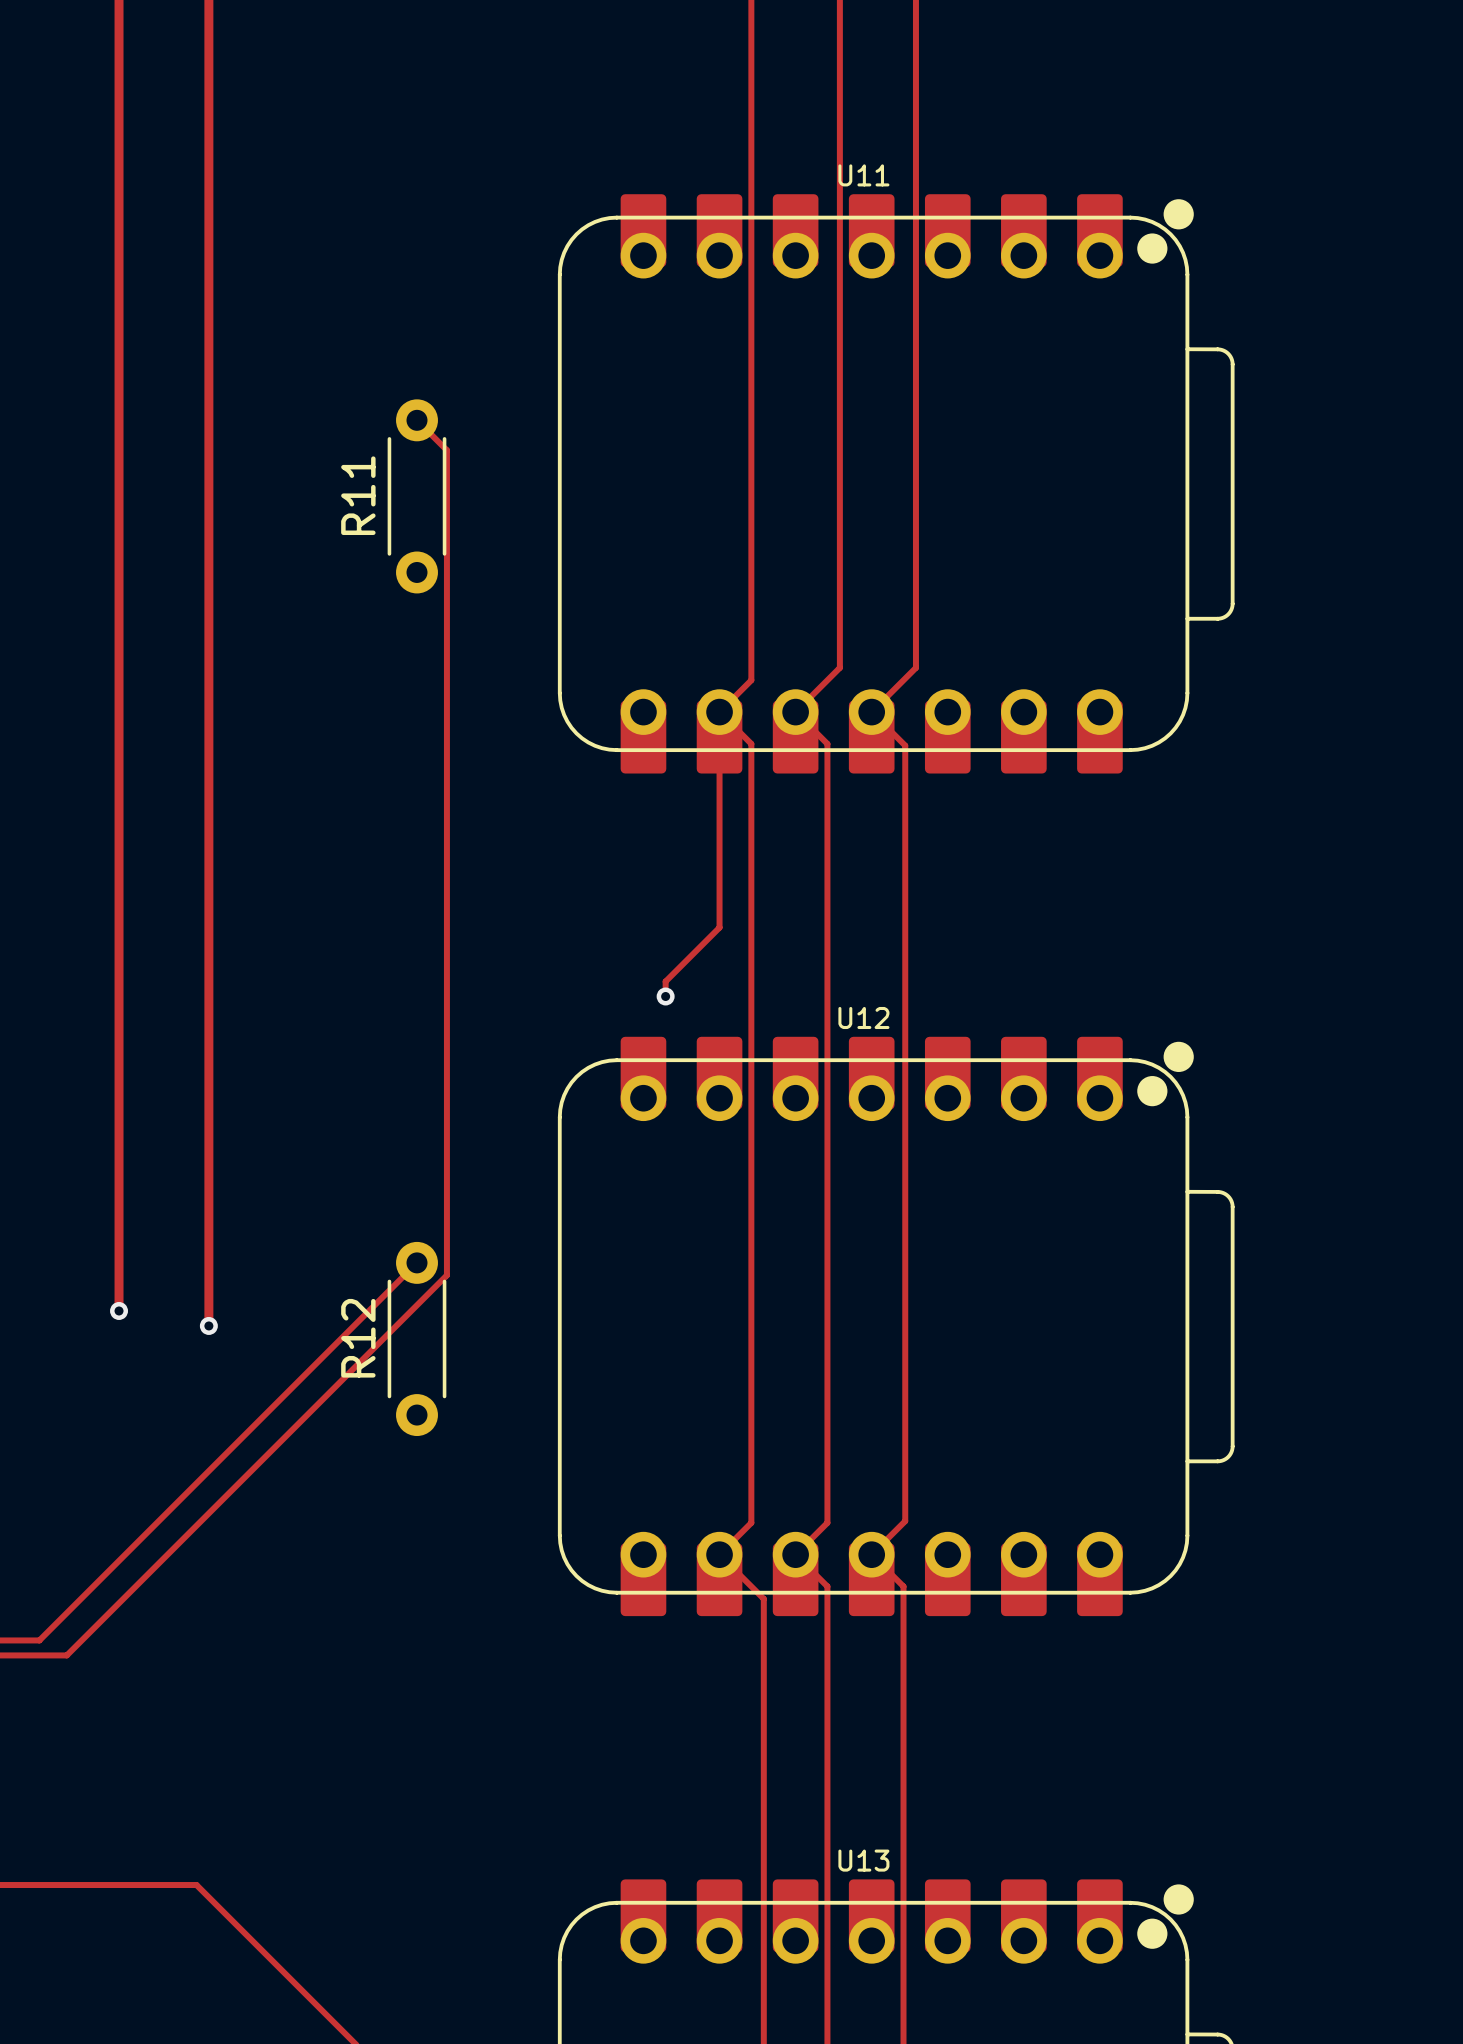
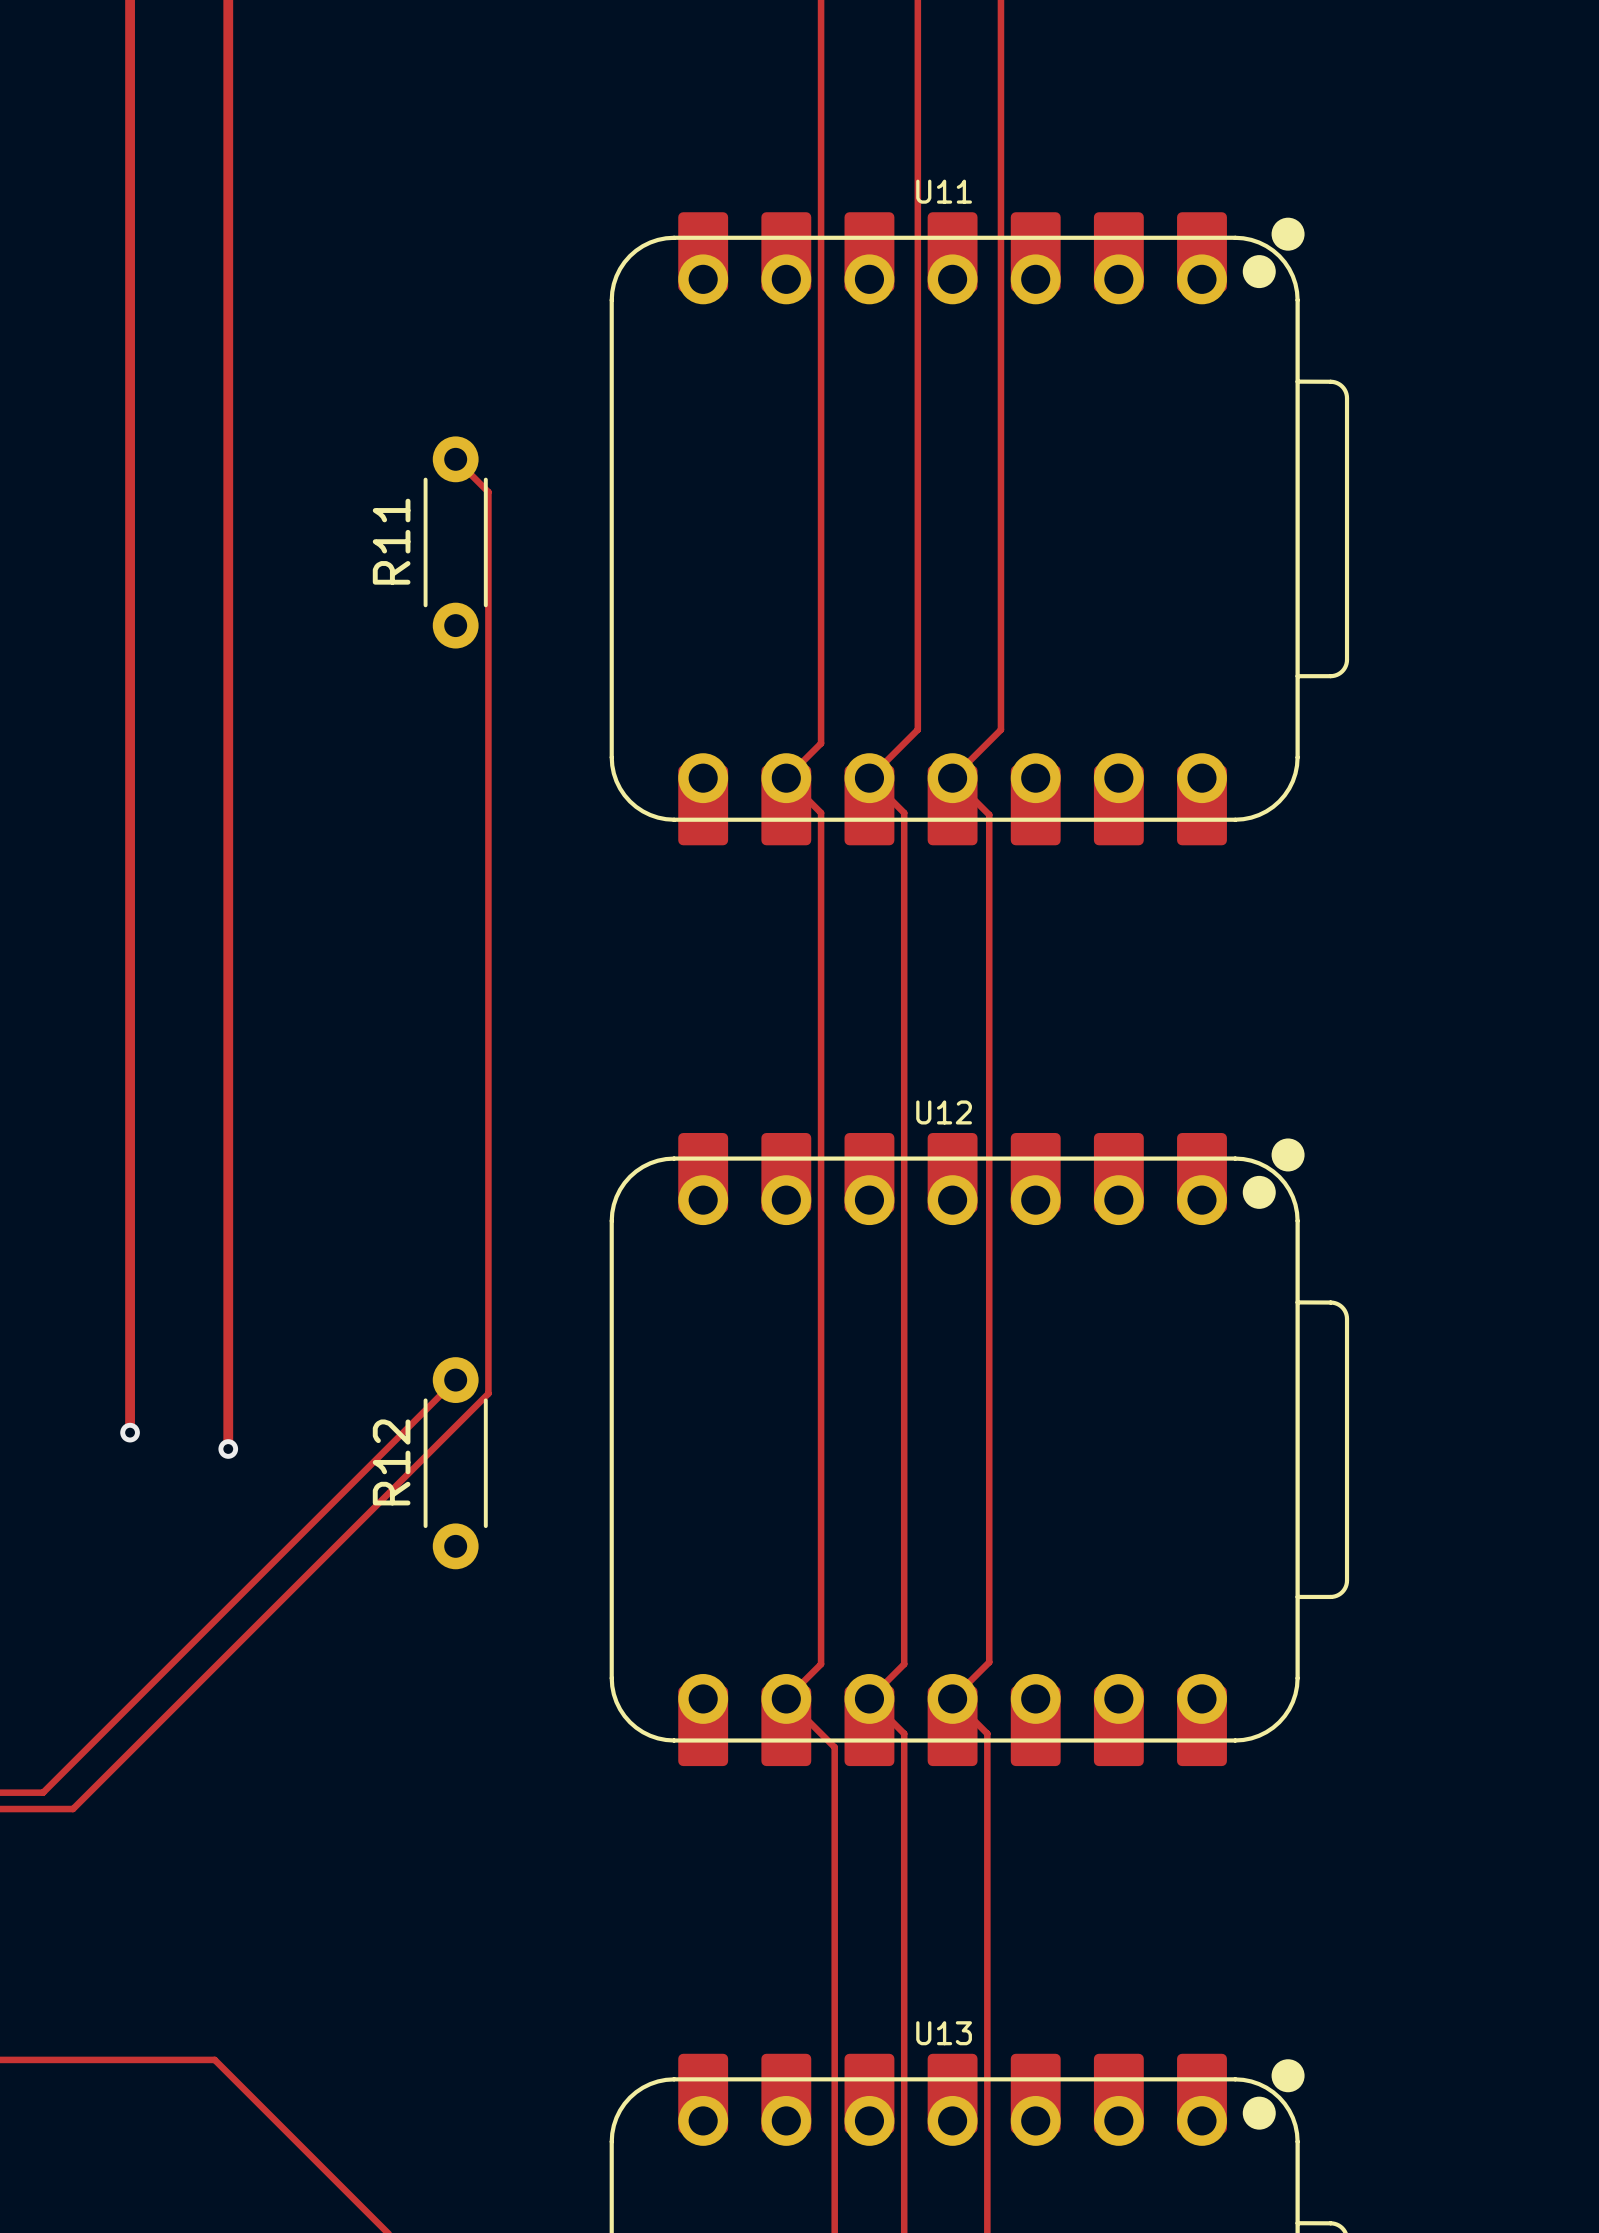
track: (719, 737) (719, 927) (665, 981) (665, 996) -> none
via: (665, 996) -> none

